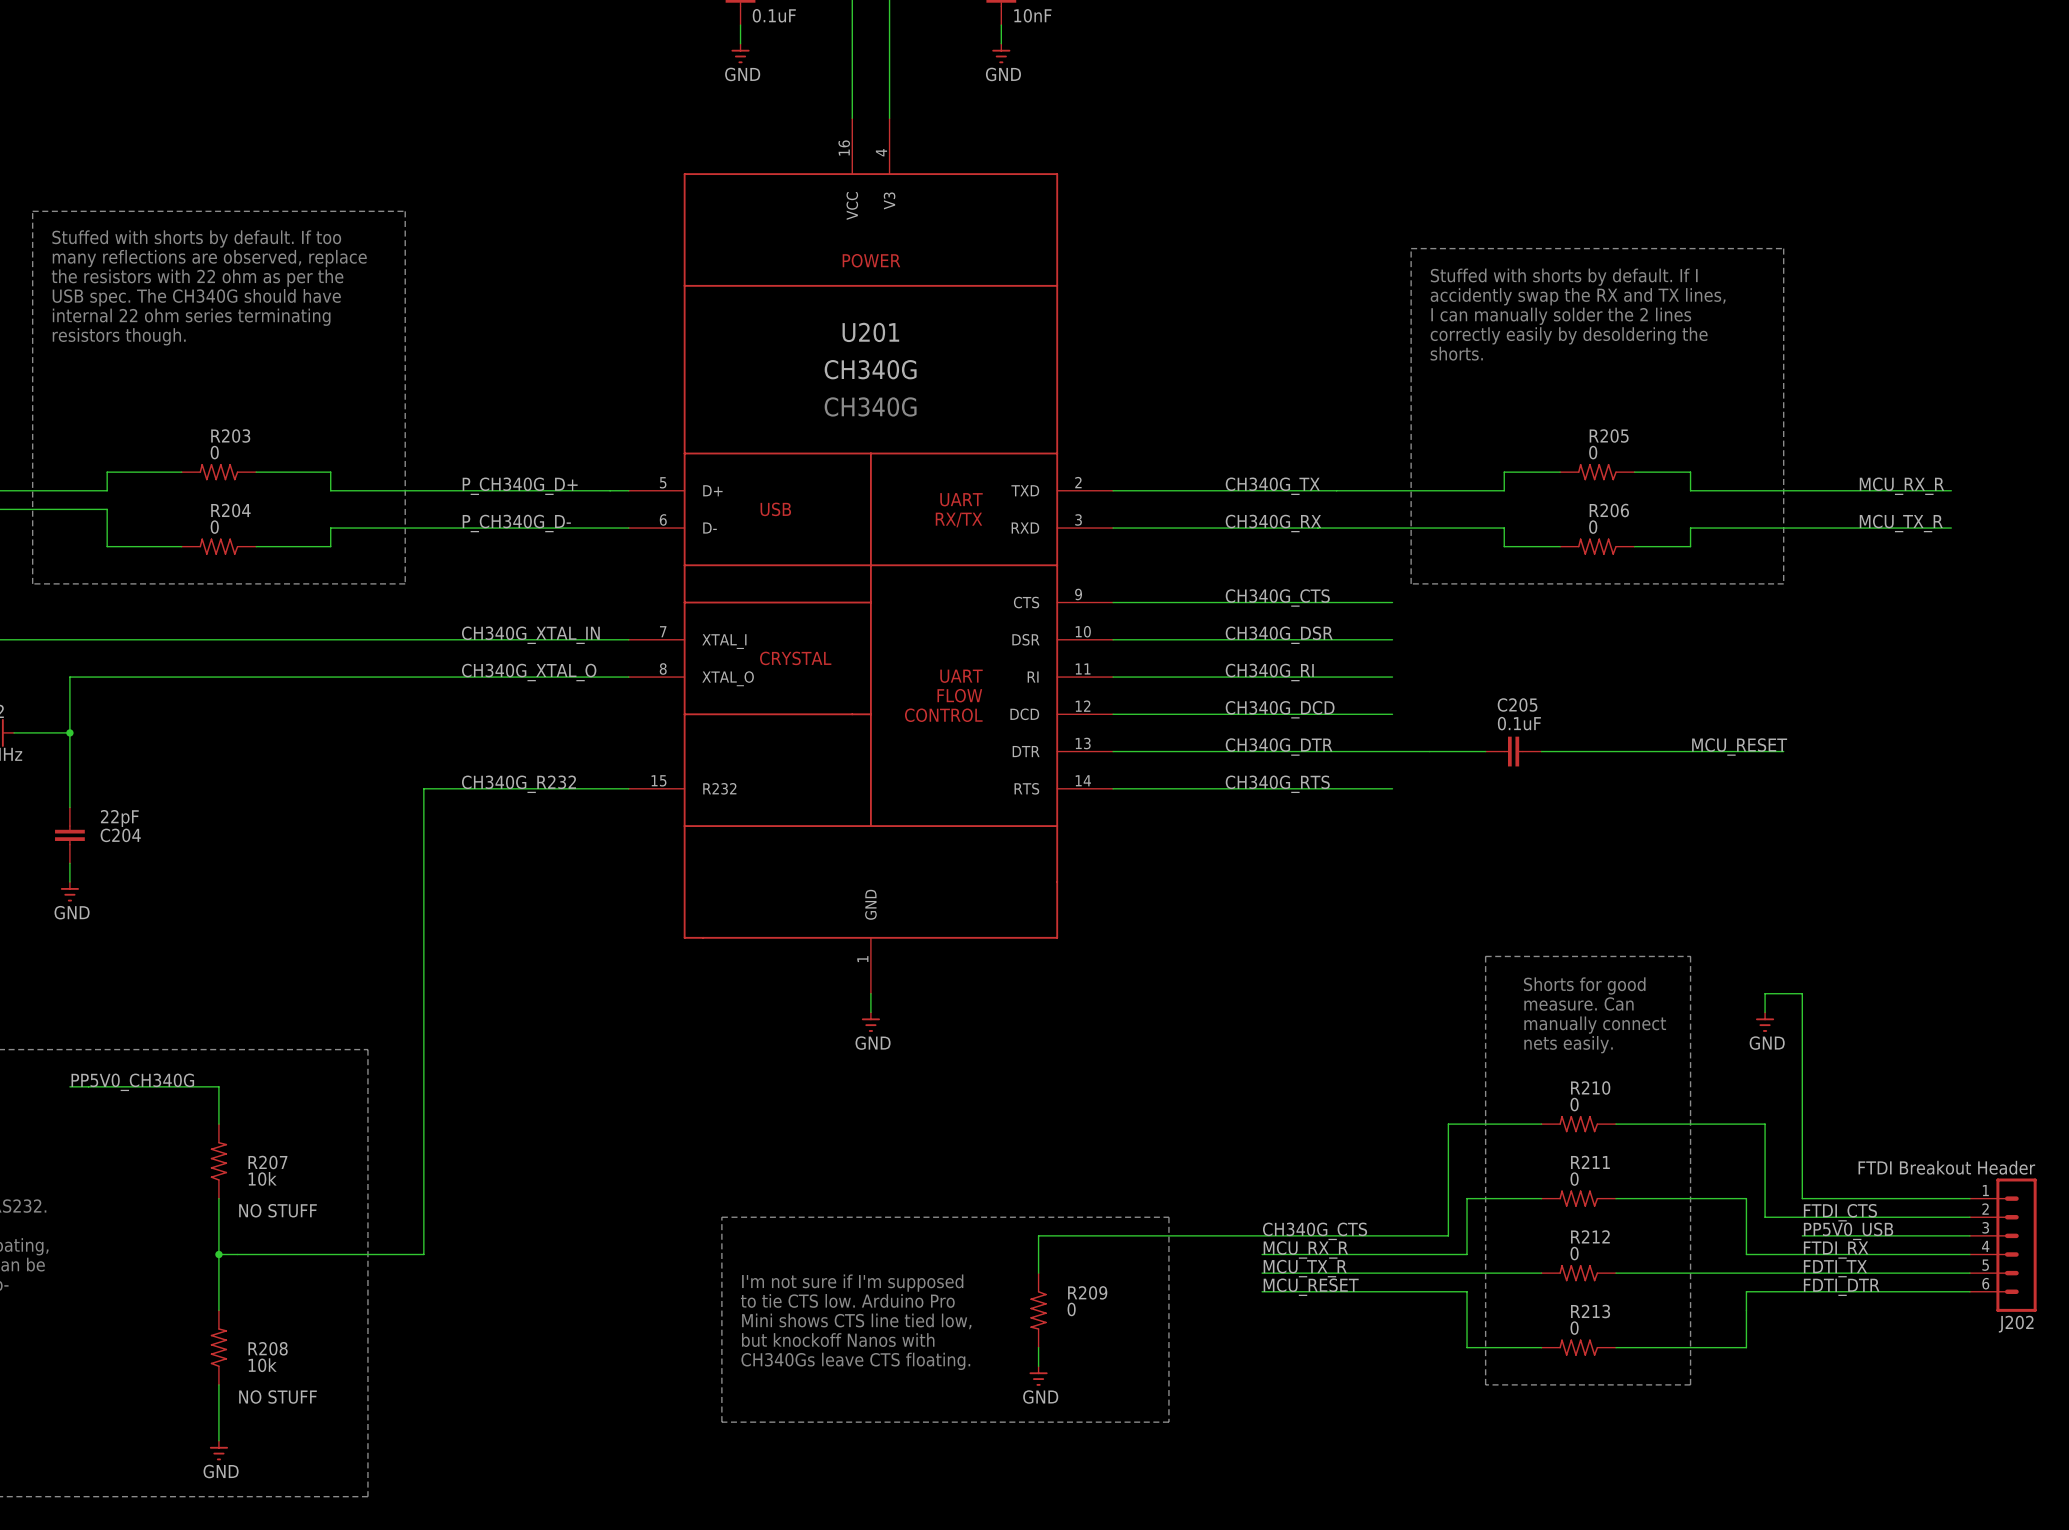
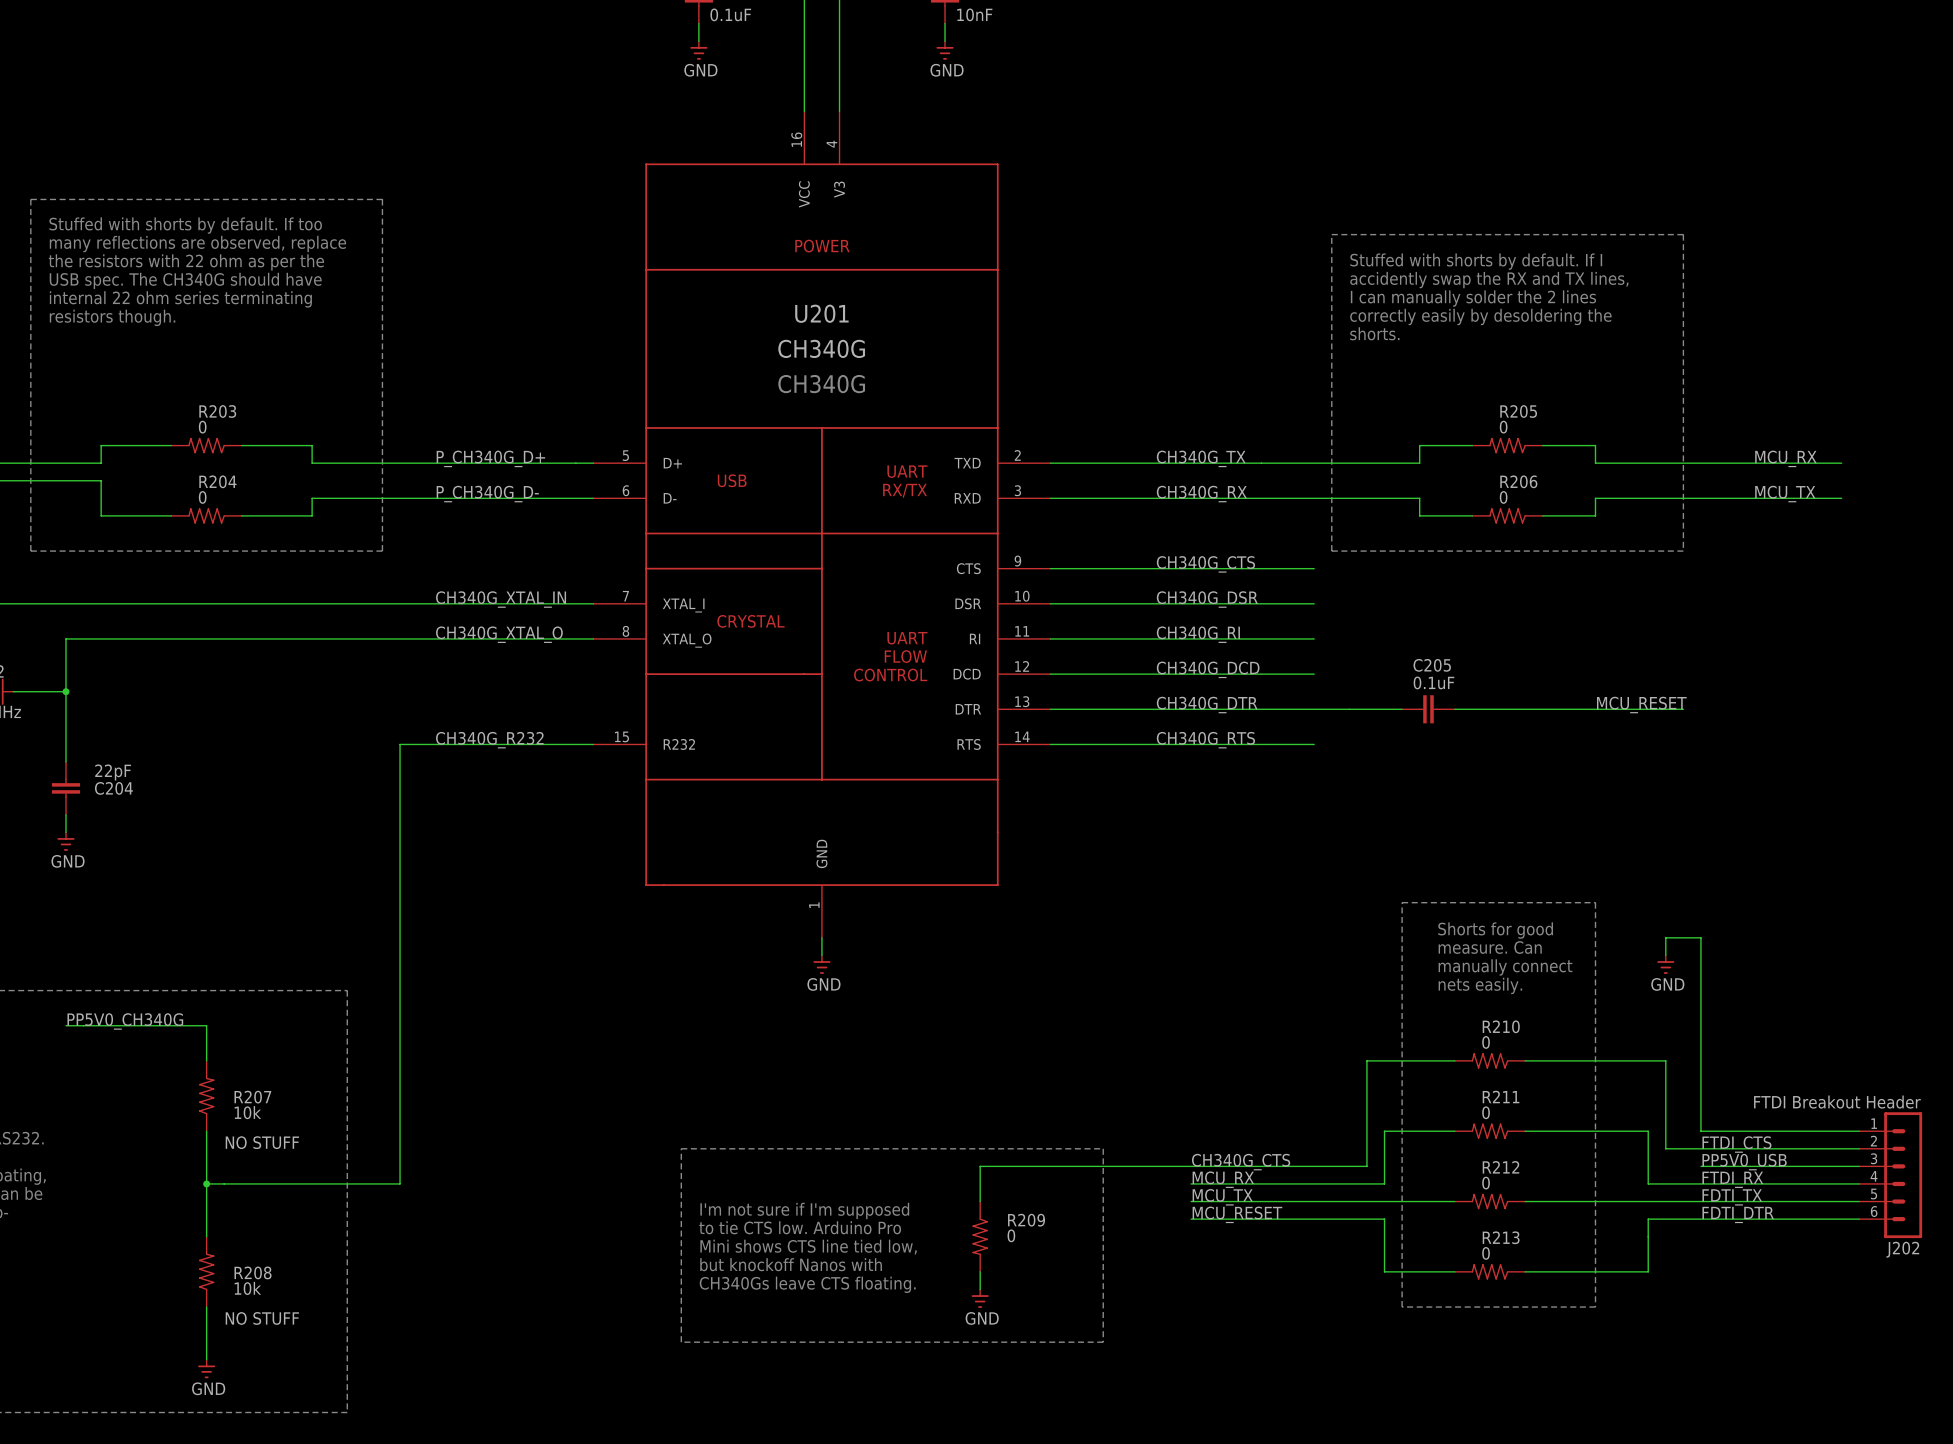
label: MCU_RX_R (1901, 486) -> MCU_RX (1785, 458)
label: MCU_TX_R (1901, 523) -> MCU_TX (1785, 494)
label: MCU_RX_R (1305, 1249) -> MCU_RX (1223, 1179)
label: MCU_TX_R (1305, 1268) -> MCU_TX (1222, 1197)

